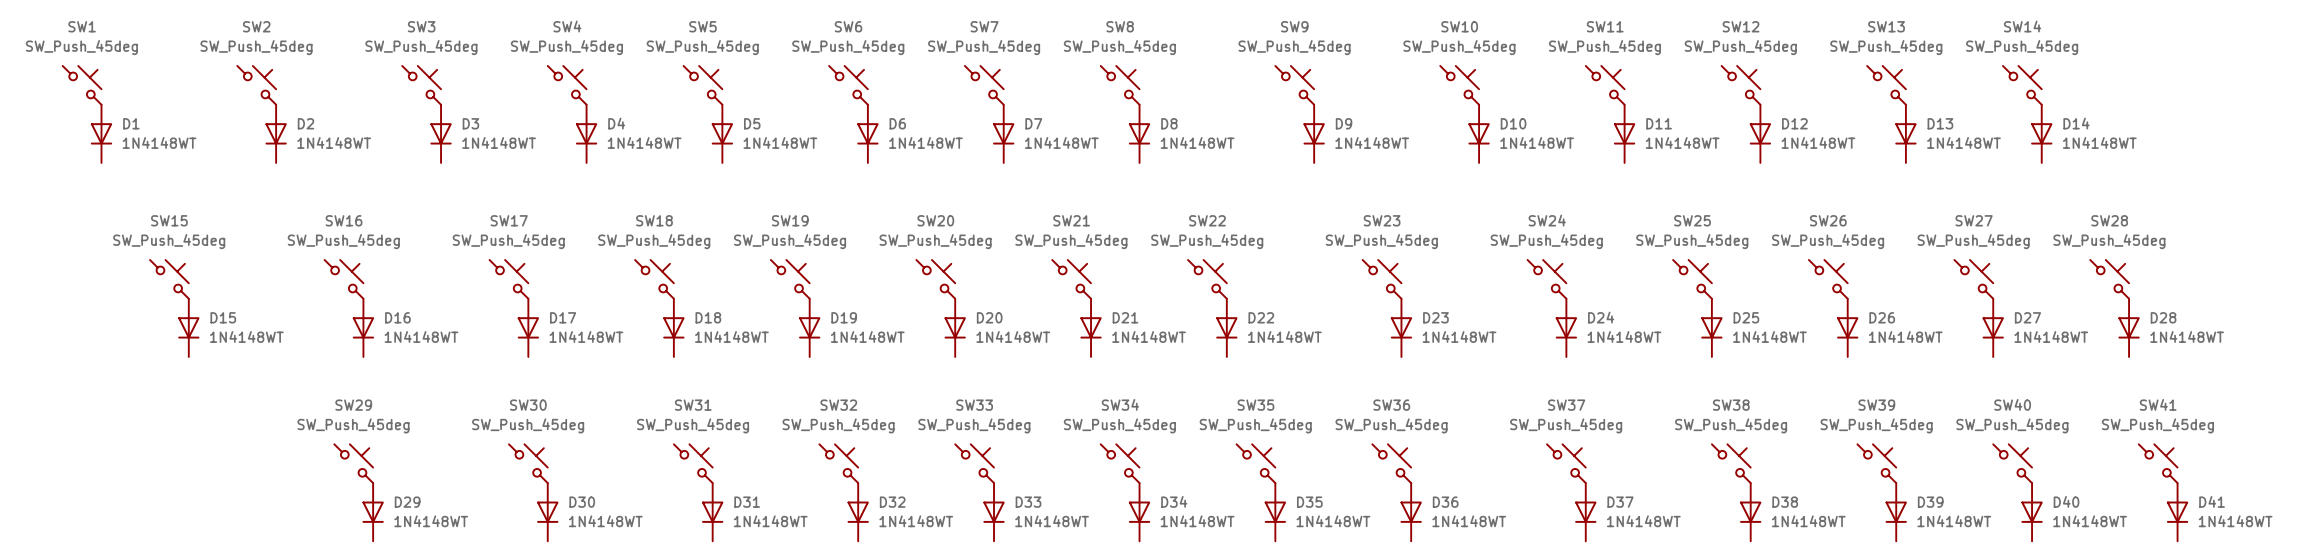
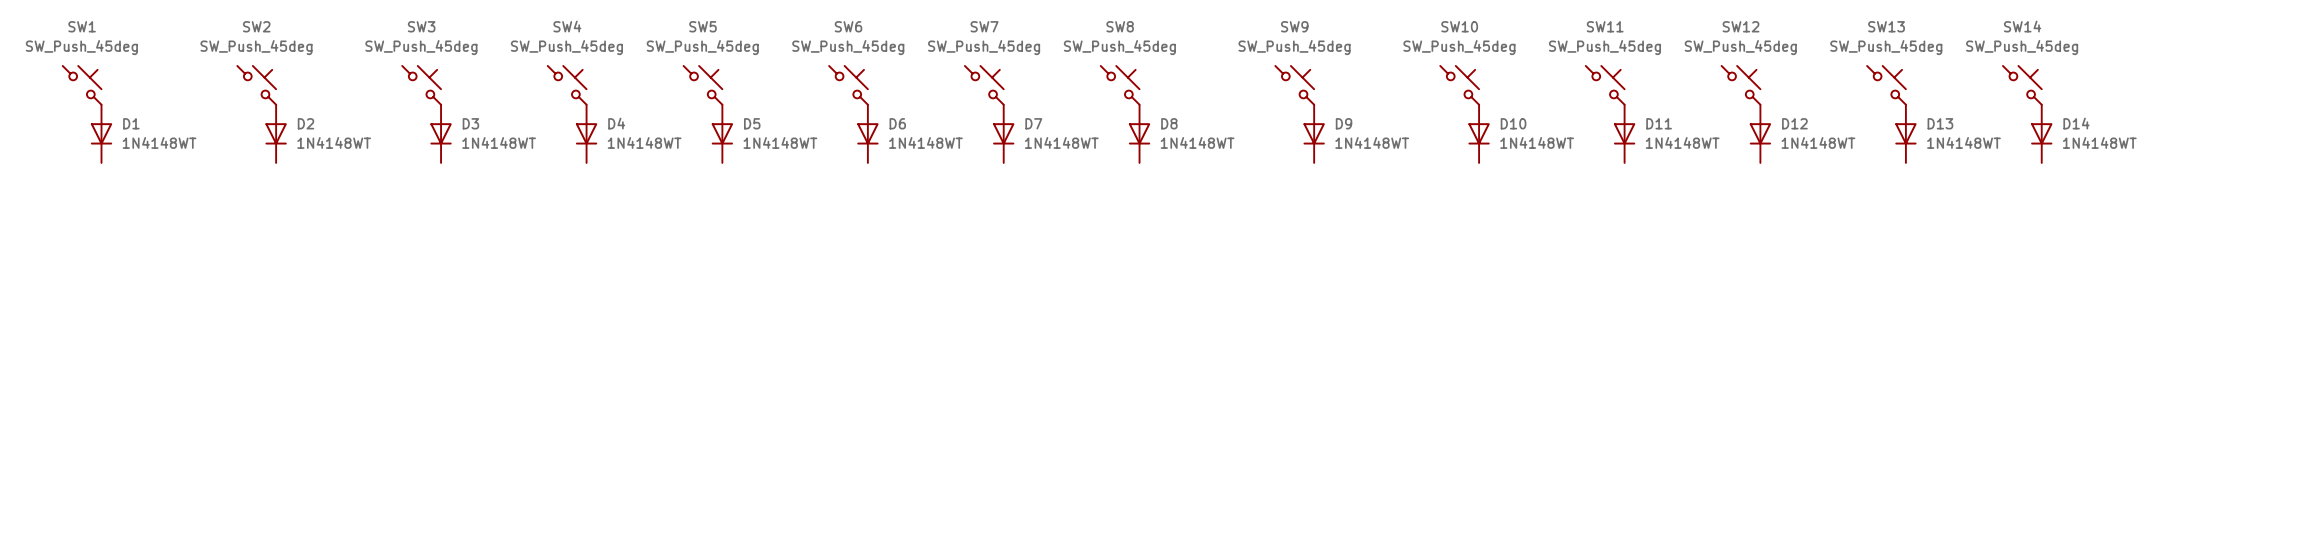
SW15: SW_Push_45deg (169, 279) -> none
SW16: SW_Push_45deg (344, 279) -> none
SW17: SW_Push_45deg (508, 279) -> none
SW18: SW_Push_45deg (654, 279) -> none
SW19: SW_Push_45deg (790, 279) -> none
SW20: SW_Push_45deg (935, 279) -> none
SW21: SW_Push_45deg (1071, 279) -> none
SW22: SW_Push_45deg (1207, 279) -> none
SW23: SW_Push_45deg (1382, 279) -> none
SW24: SW_Push_45deg (1546, 279) -> none
SW25: SW_Push_45deg (1692, 279) -> none
SW26: SW_Push_45deg (1828, 279) -> none
SW27: SW_Push_45deg (1973, 279) -> none
SW28: SW_Push_45deg (2109, 279) -> none
D15: 1N4148WT (188, 327) -> none
D16: 1N4148WT (363, 327) -> none
D17: 1N4148WT (528, 327) -> none
D18: 1N4148WT (673, 327) -> none
D19: 1N4148WT (809, 327) -> none
D20: 1N4148WT (955, 327) -> none
D21: 1N4148WT (1091, 327) -> none
D22: 1N4148WT (1226, 327) -> none
D23: 1N4148WT (1401, 327) -> none
D24: 1N4148WT (1566, 327) -> none
D25: 1N4148WT (1711, 327) -> none
D26: 1N4148WT (1847, 327) -> none
D27: 1N4148WT (1993, 327) -> none
D28: 1N4148WT (2129, 327) -> none
SW29: SW_Push_45deg (353, 463) -> none
SW30: SW_Push_45deg (528, 463) -> none
SW31: SW_Push_45deg (693, 463) -> none
SW32: SW_Push_45deg (838, 463) -> none
SW33: SW_Push_45deg (974, 463) -> none
SW34: SW_Push_45deg (1120, 463) -> none
SW35: SW_Push_45deg (1255, 463) -> none
SW36: SW_Push_45deg (1391, 463) -> none
SW37: SW_Push_45deg (1566, 463) -> none
SW38: SW_Push_45deg (1731, 463) -> none
SW39: SW_Push_45deg (1876, 463) -> none
SW40: SW_Push_45deg (2012, 463) -> none
SW41: SW_Push_45deg (2158, 463) -> none
D29: 1N4148WT (373, 512) -> none
D30: 1N4148WT (547, 512) -> none
D31: 1N4148WT (712, 512) -> none
D32: 1N4148WT (858, 512) -> none
D33: 1N4148WT (994, 512) -> none
D34: 1N4148WT (1139, 512) -> none
D35: 1N4148WT (1275, 512) -> none
D36: 1N4148WT (1411, 512) -> none
D37: 1N4148WT (1585, 512) -> none
D38: 1N4148WT (1750, 512) -> none
D39: 1N4148WT (1896, 512) -> none
D40: 1N4148WT (2032, 512) -> none
D41: 1N4148WT (2177, 512) -> none

